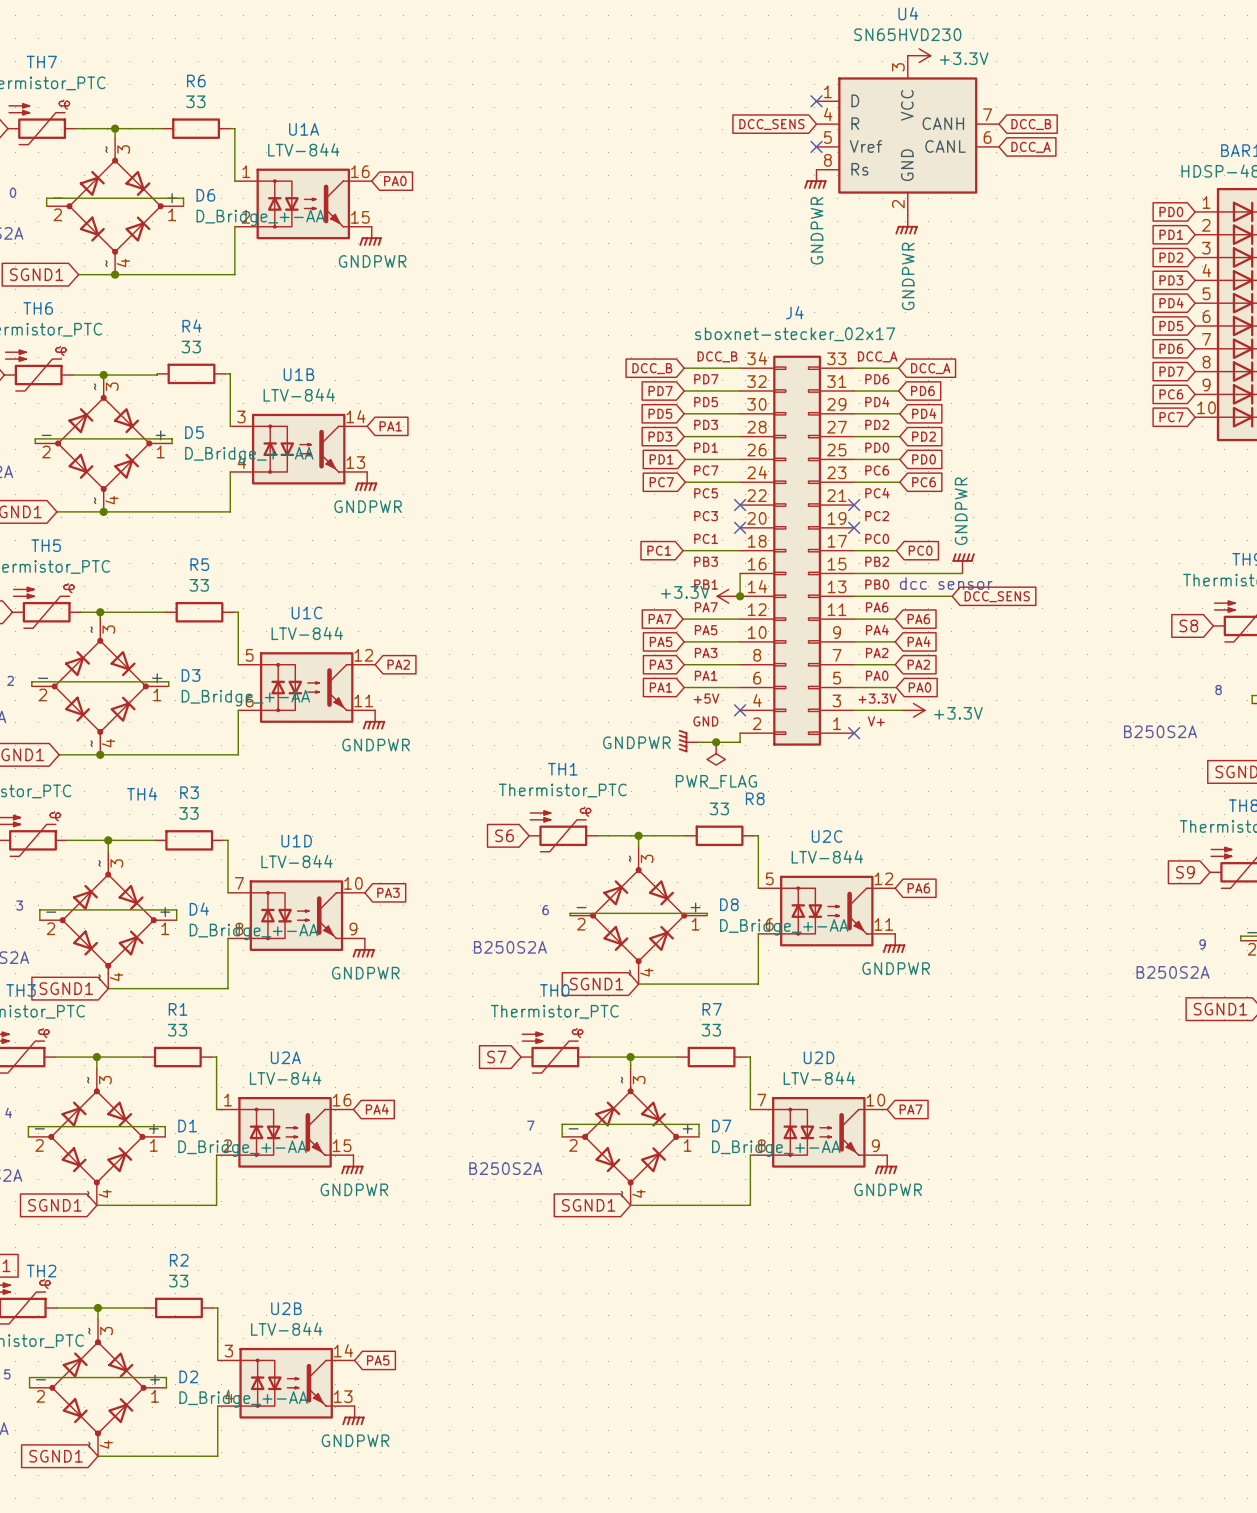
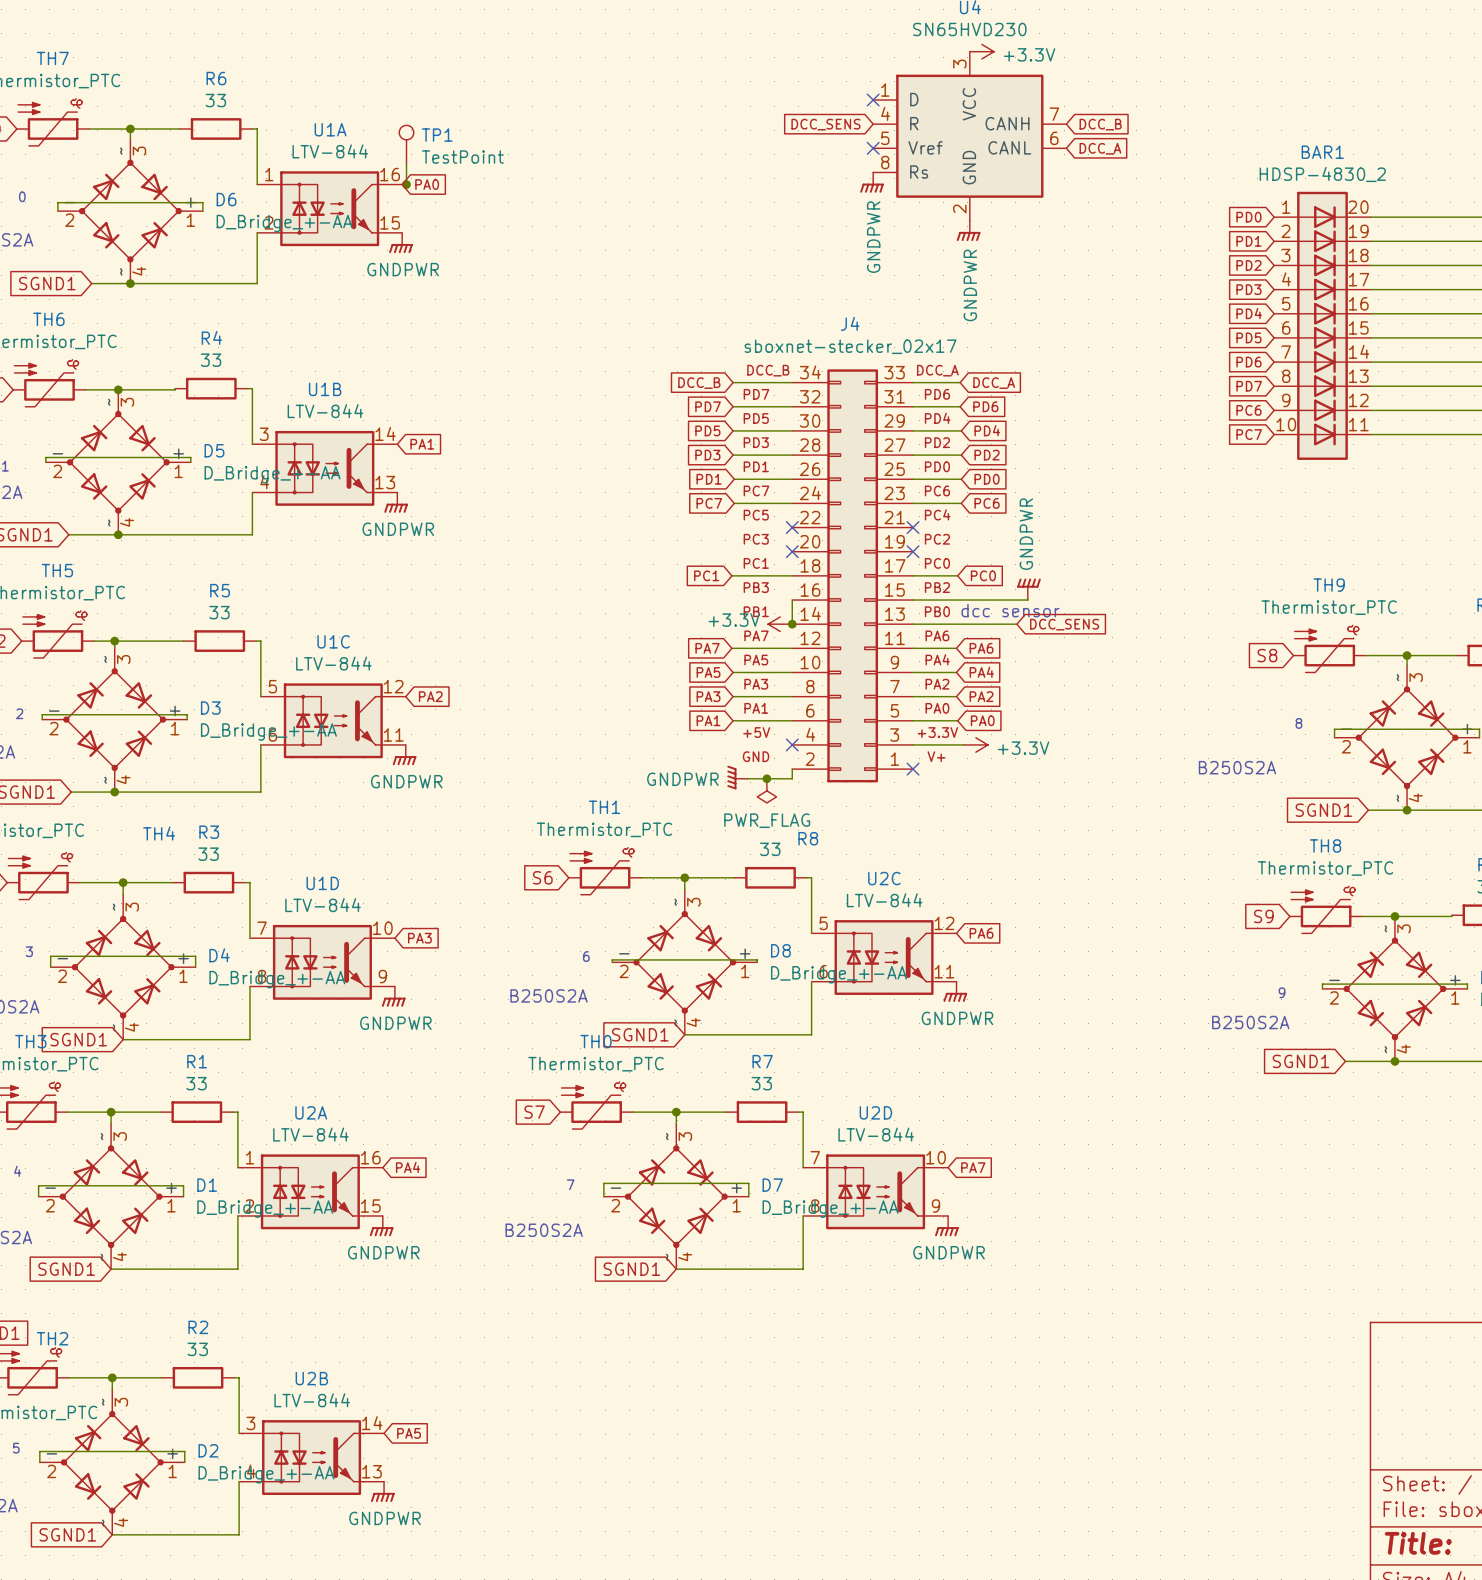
TP1: none -> TestPoint (406, 144)
wire: none -> (406, 164) (406, 184)
junction: none -> (406, 184)

